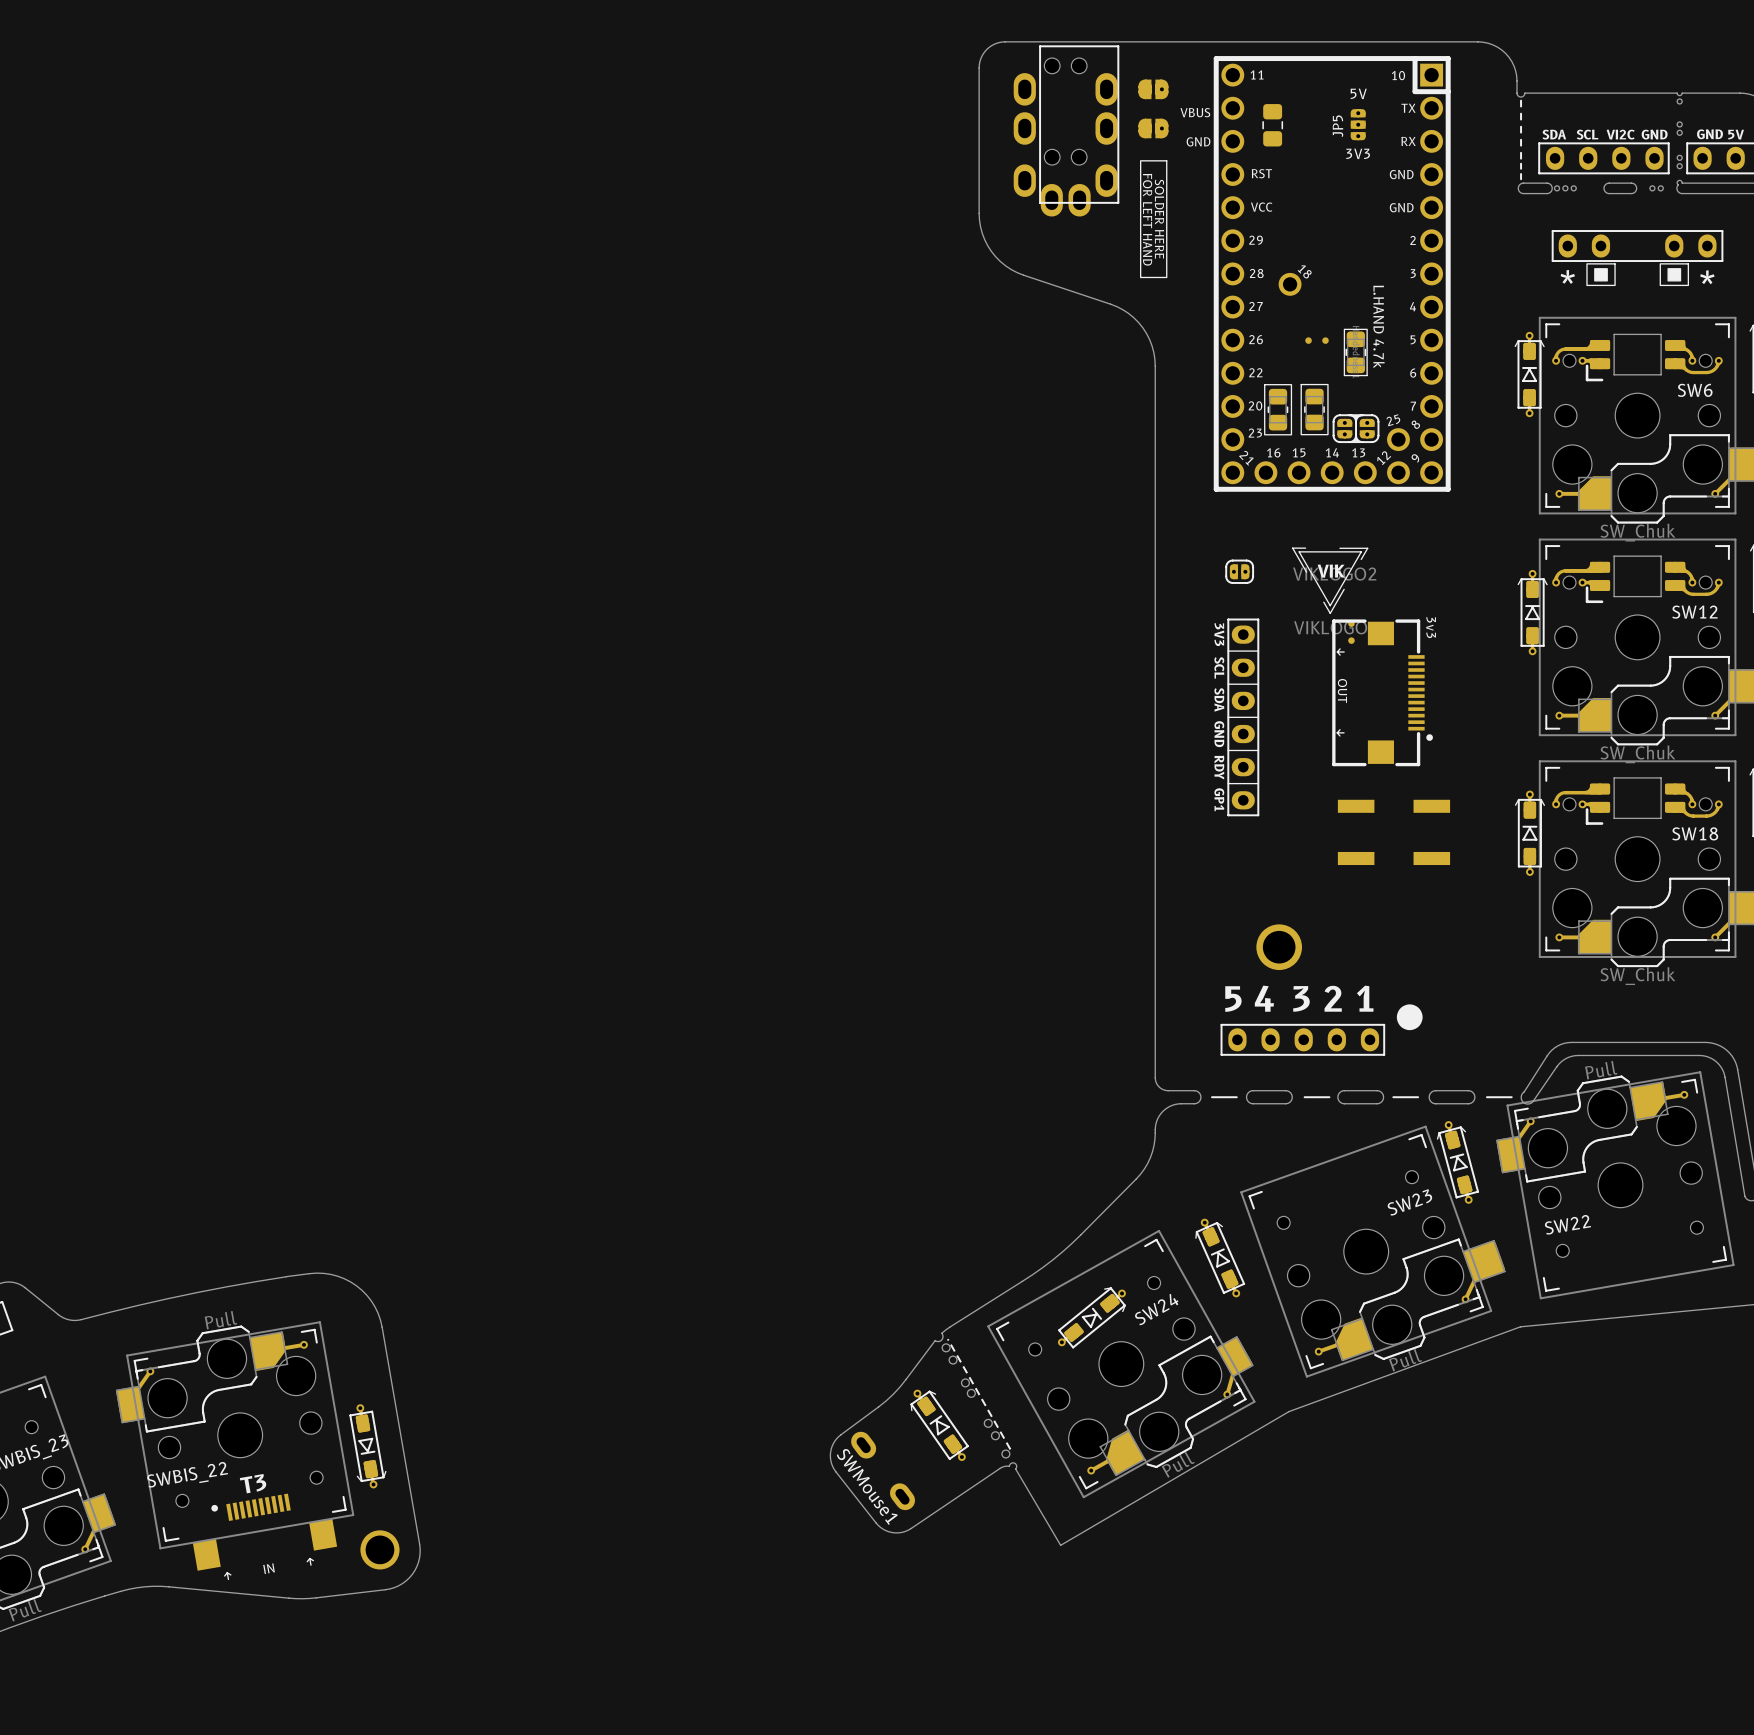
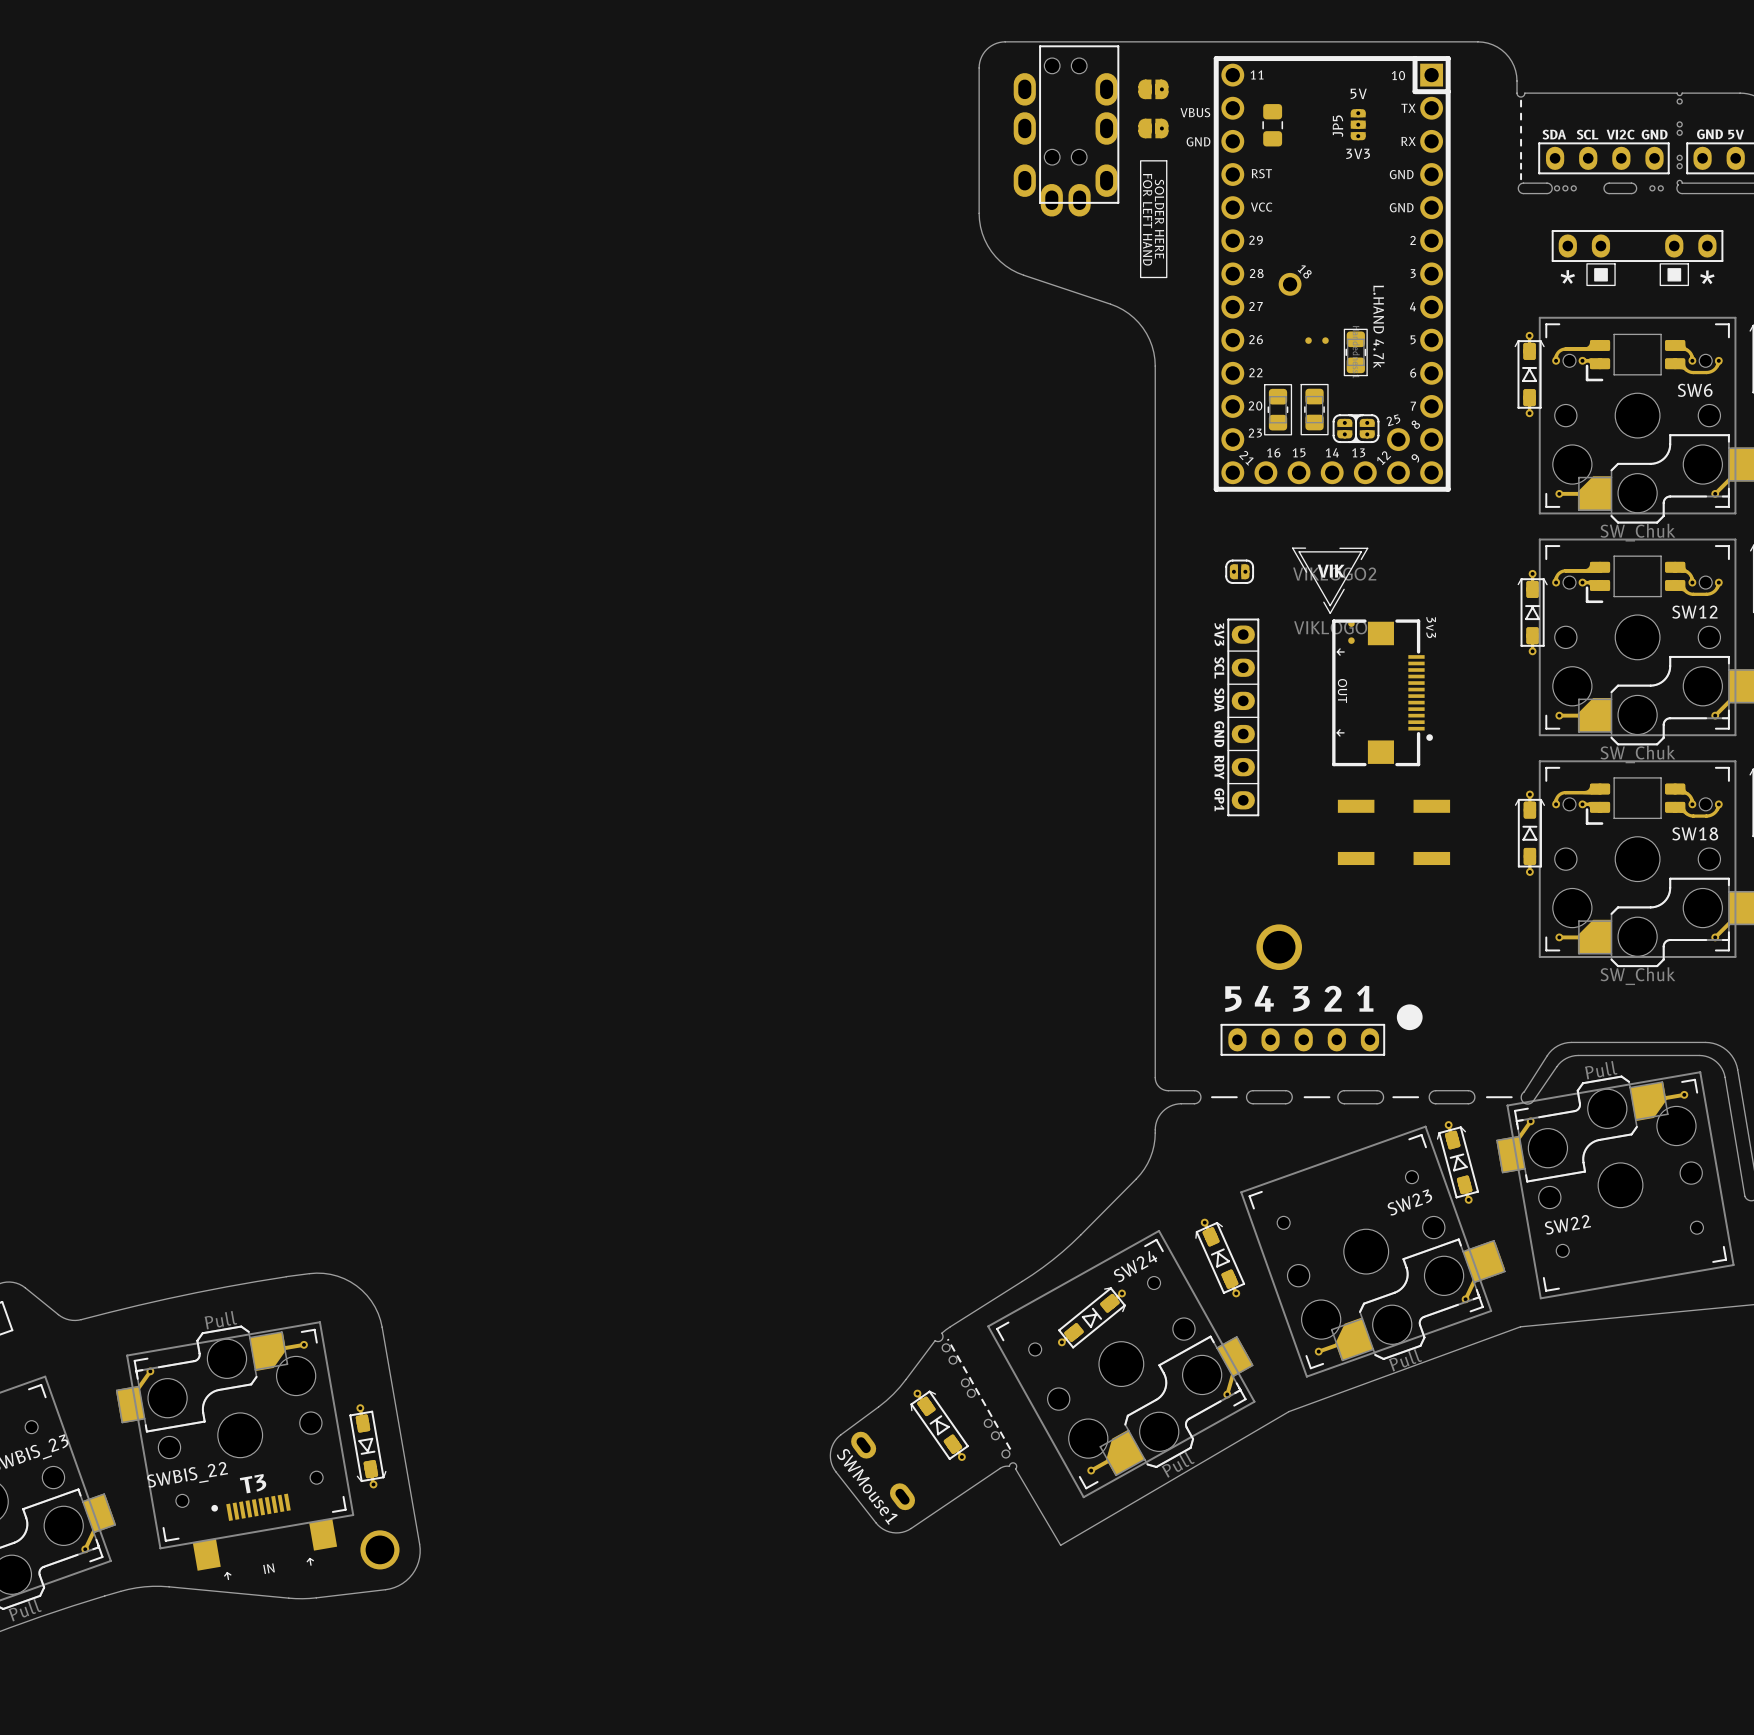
SW24 name position: SW24 (1156, 1309) -> SW24 (1135, 1266)

